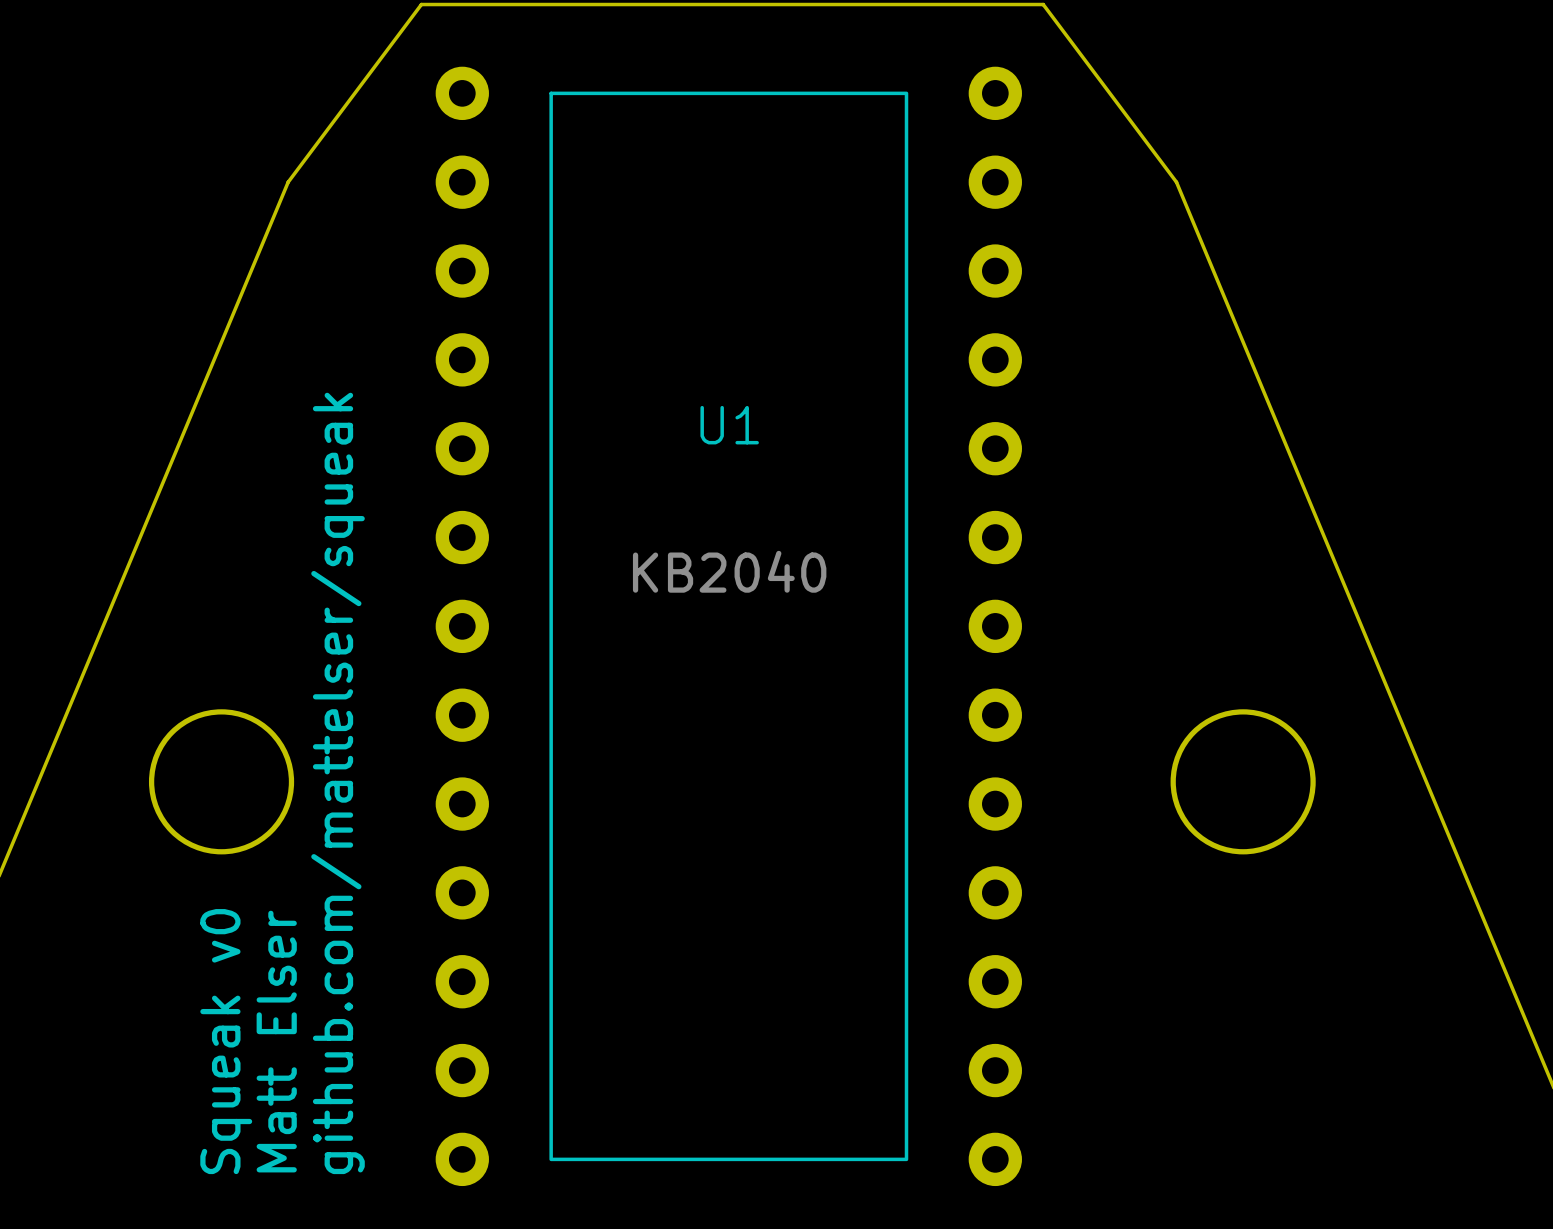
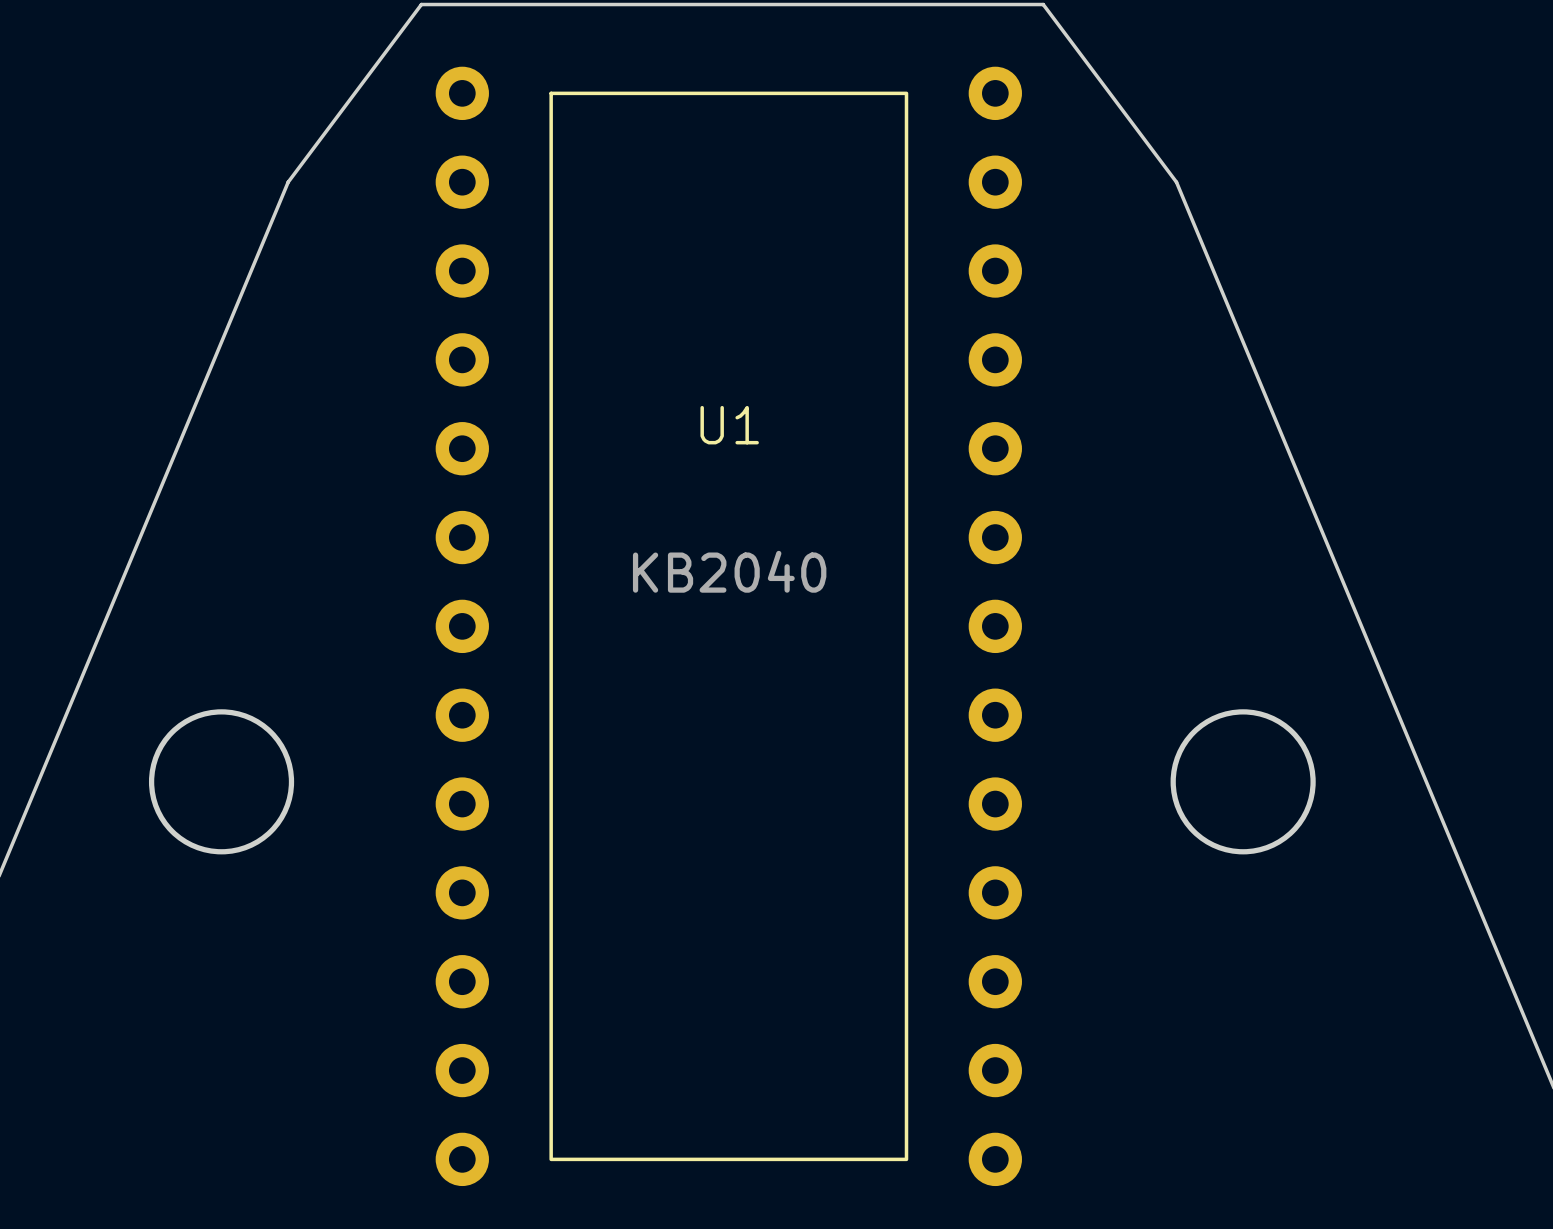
text: github.com/mattelser/squeak (338, 783) -> none
text: Squeak v0 (226, 1041) -> none
text: Matt Elser (276, 1041) -> none

